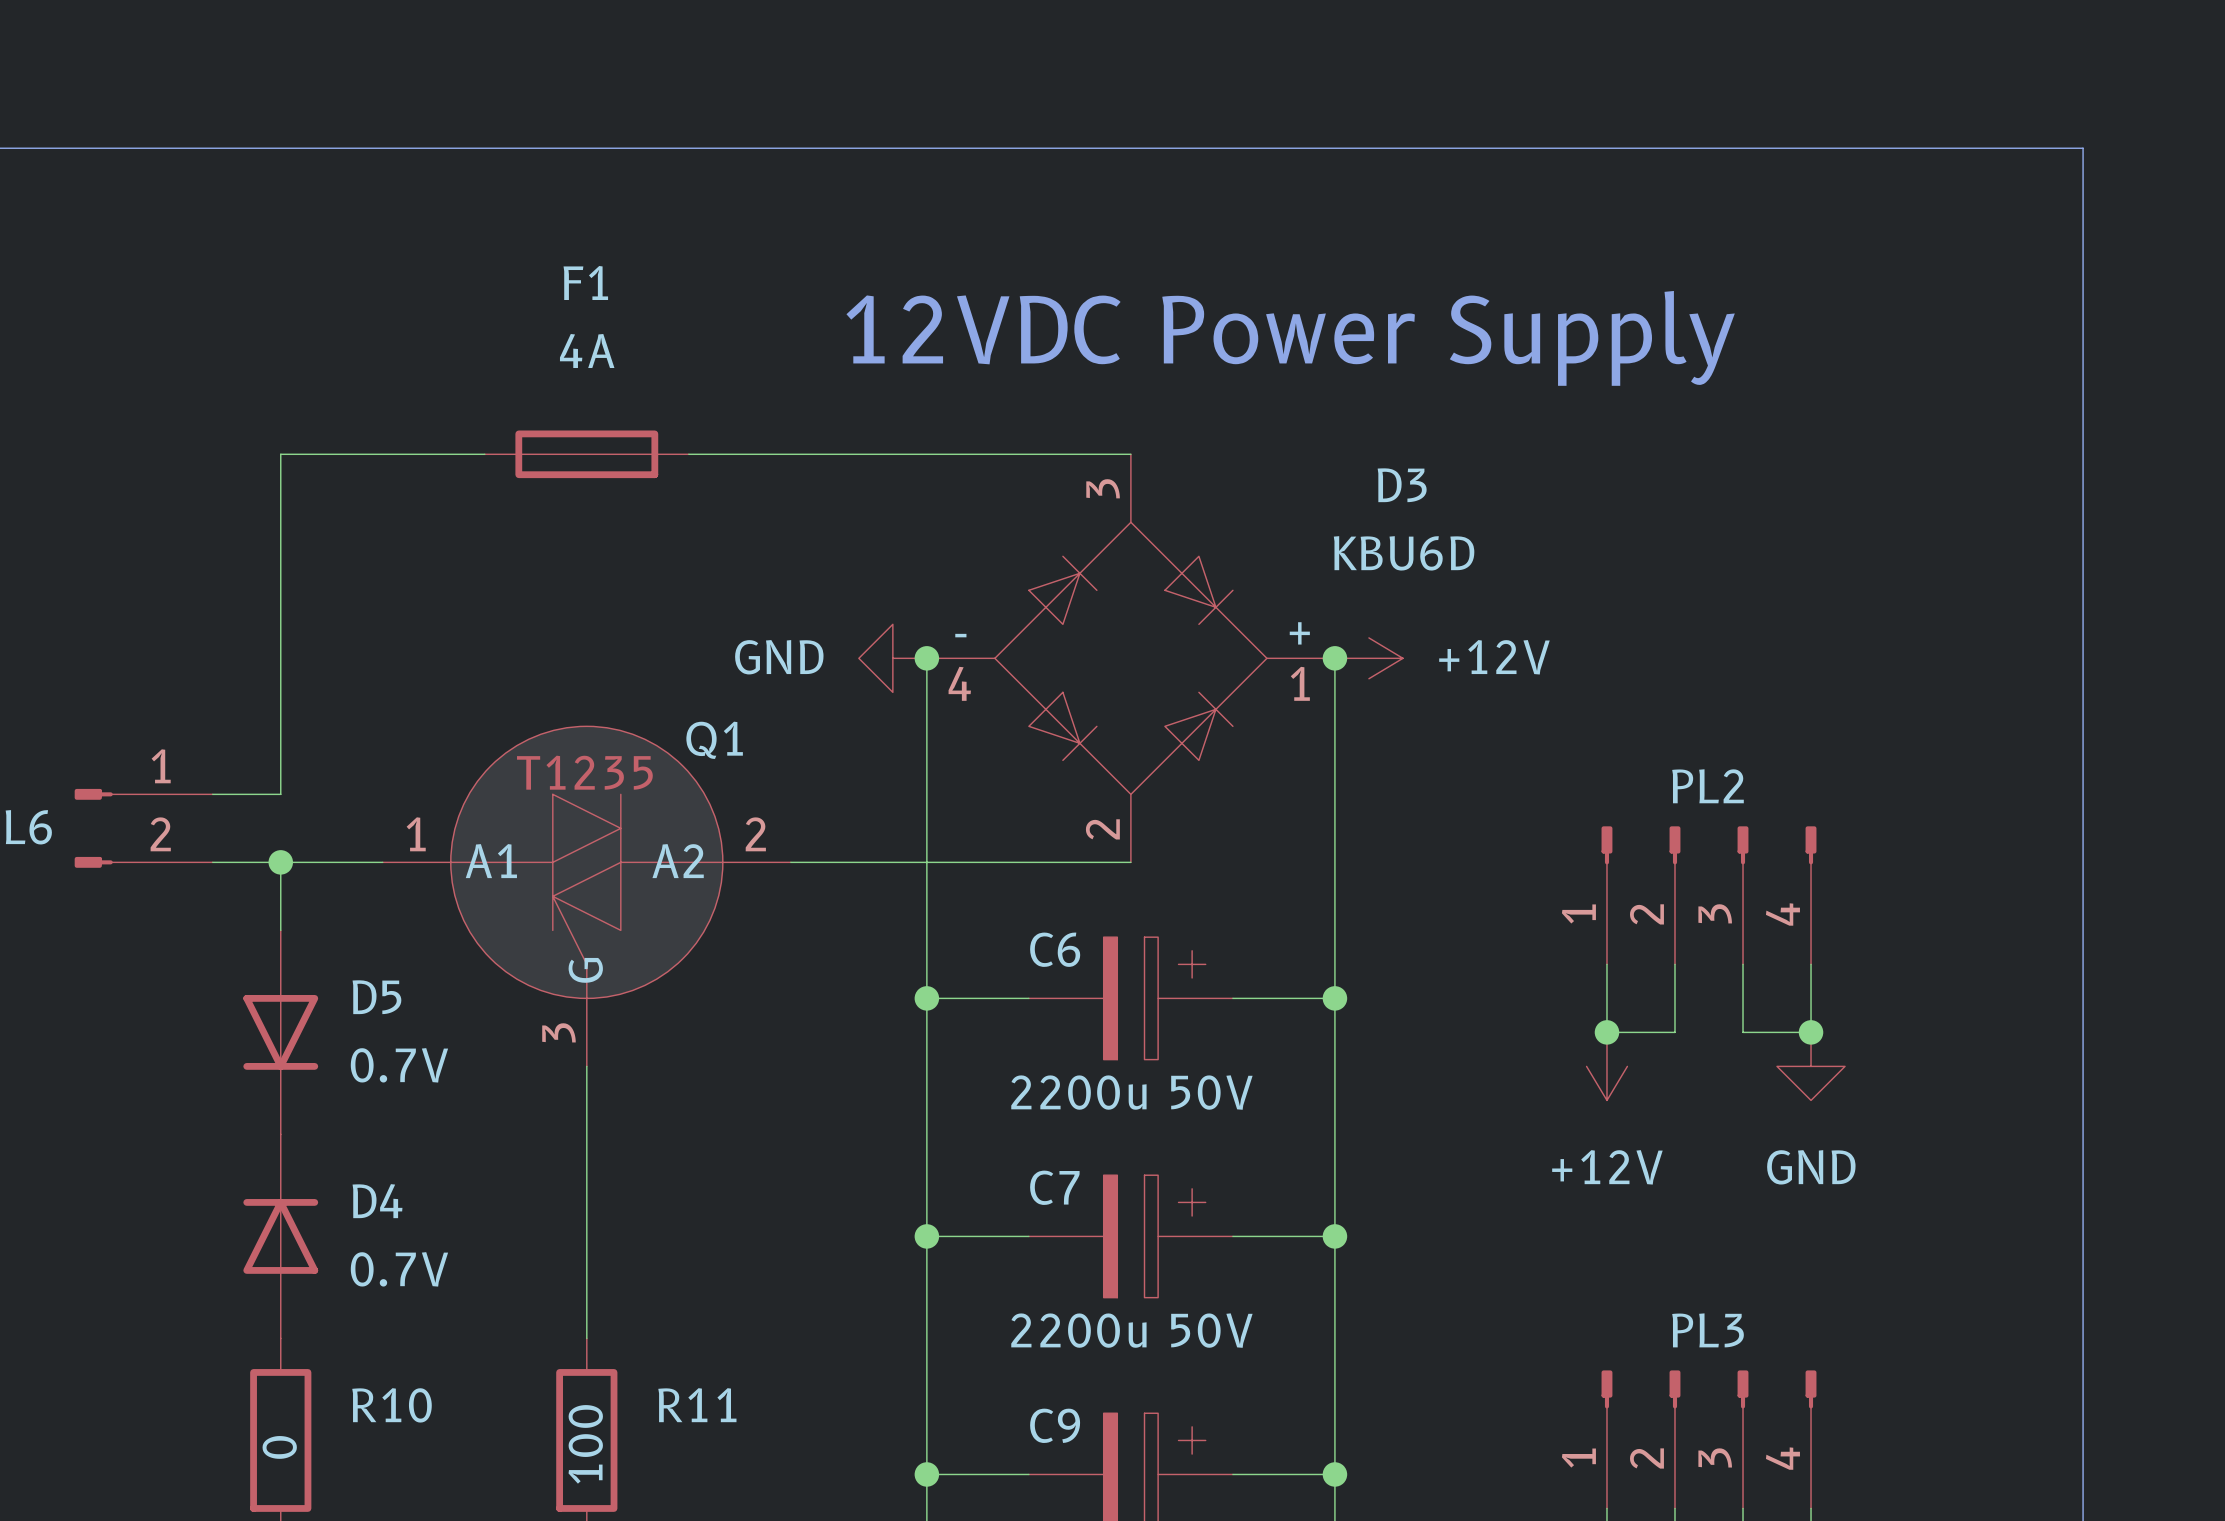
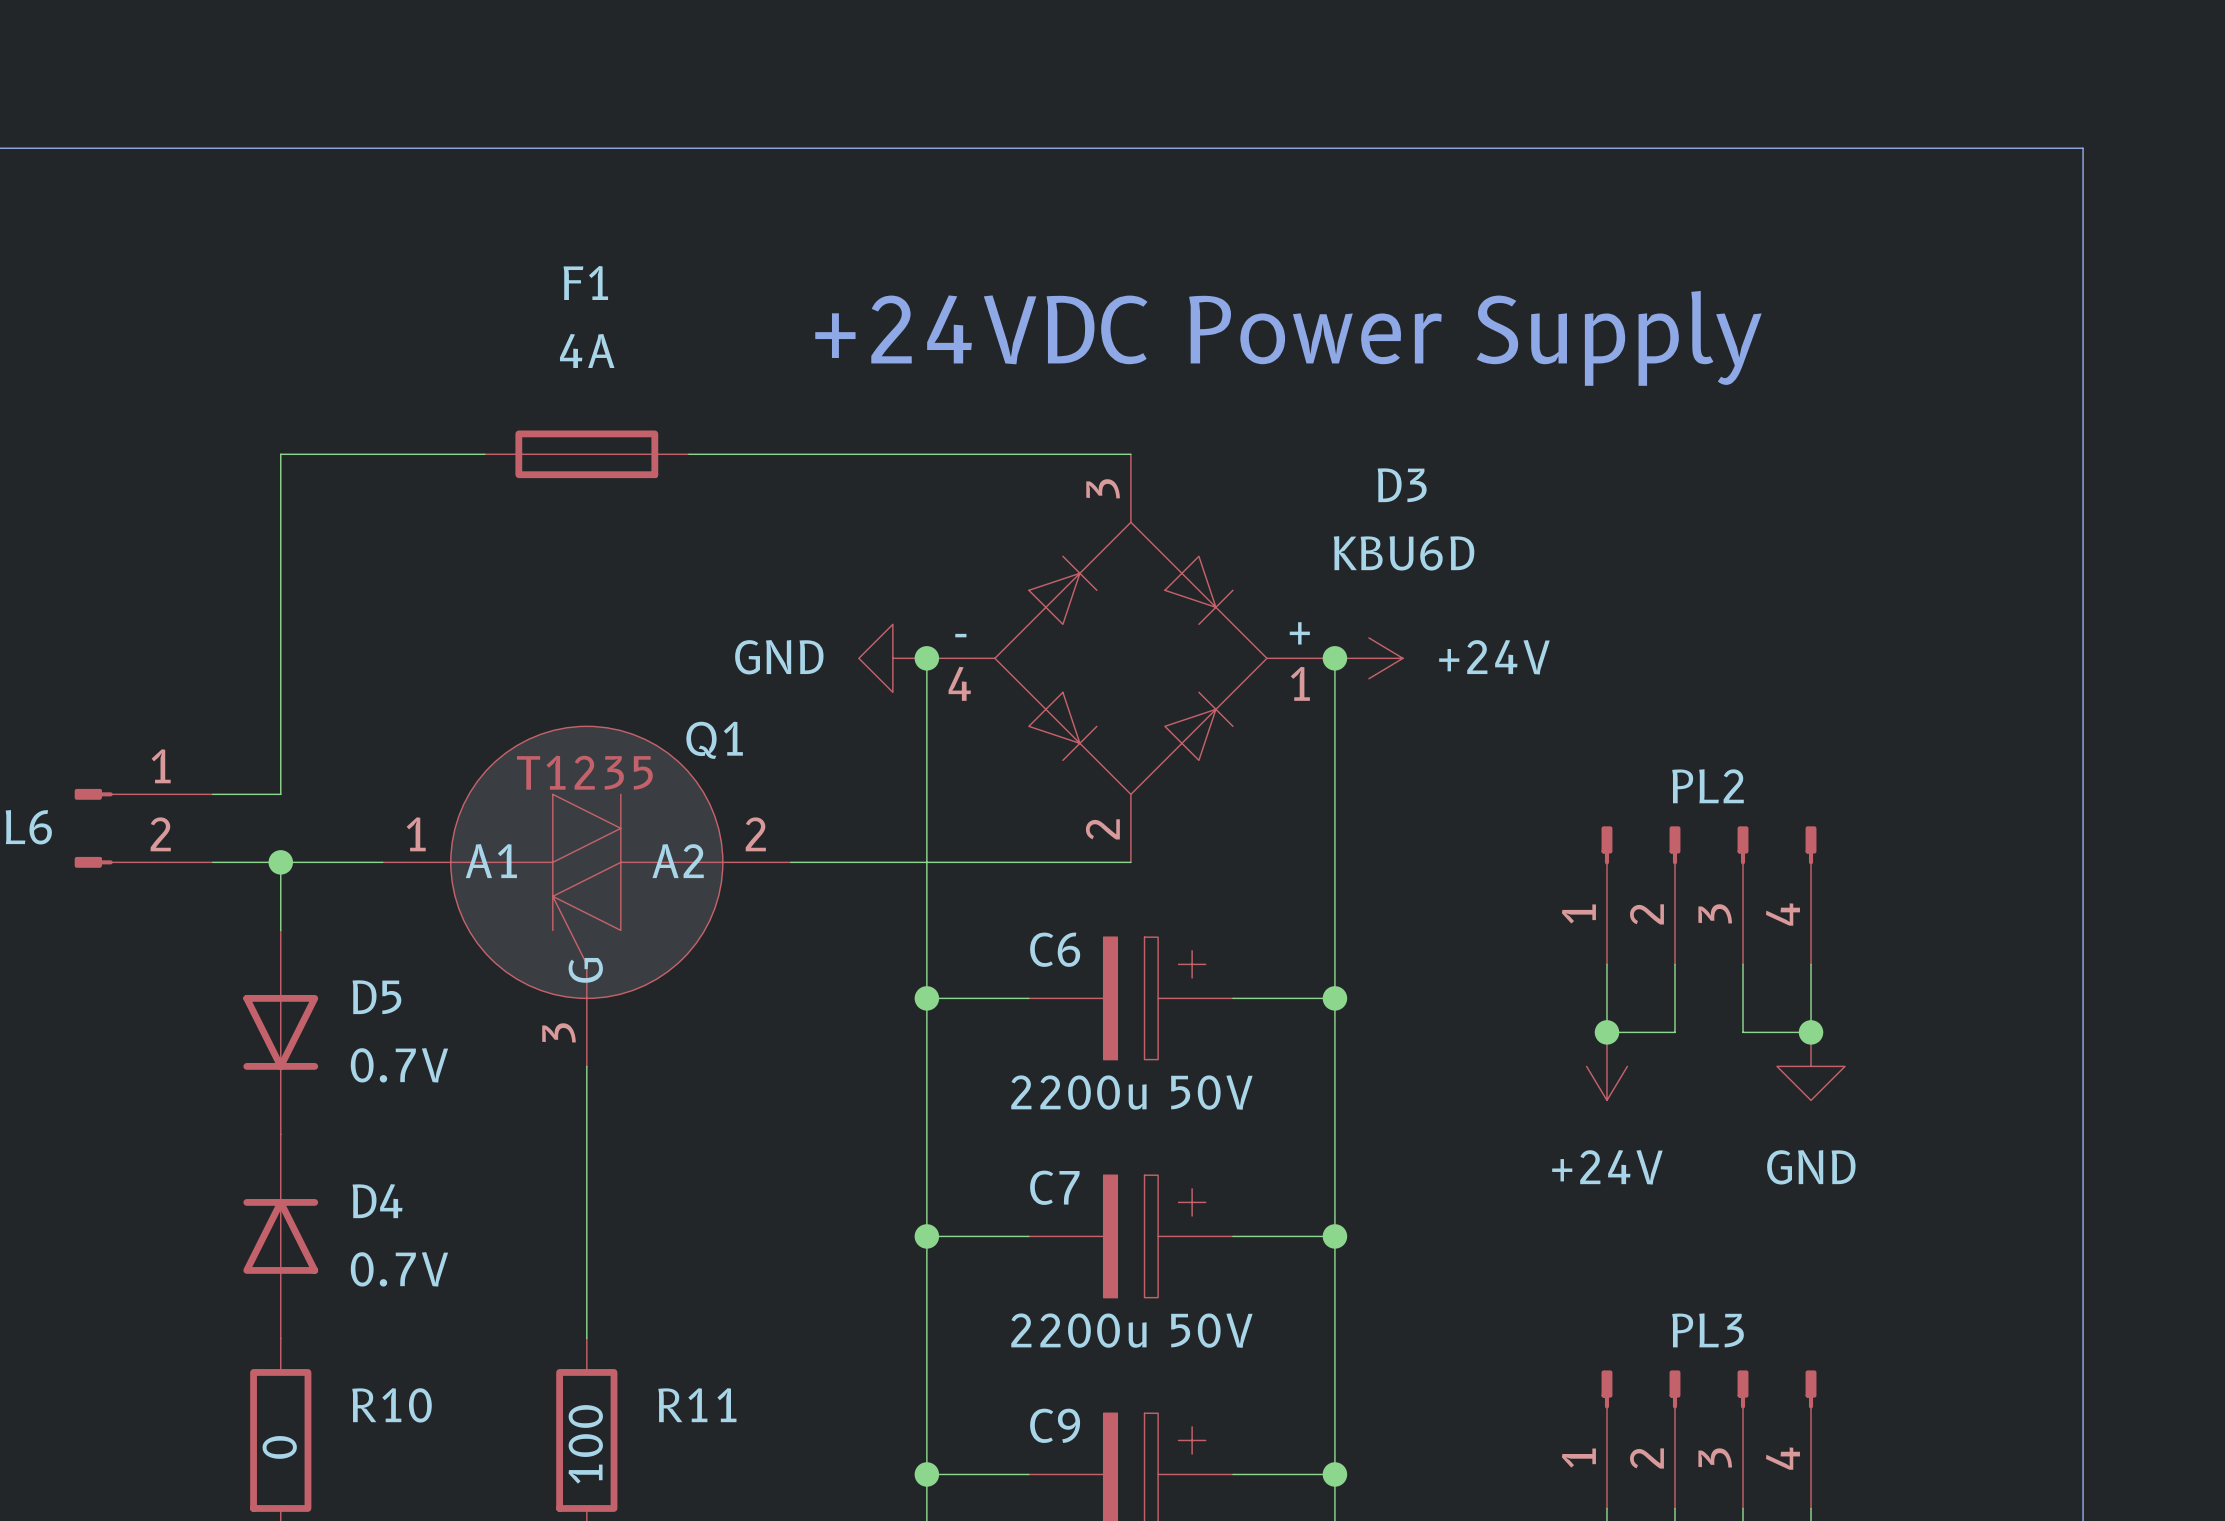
text: 12VDC Power Supply (1290, 338) -> +24VDC Power Supply (1288, 338)
power symbol: +12V (1368, 658) -> +24V (1368, 658)
power symbol: +12V (1606, 1066) -> +24V (1606, 1066)

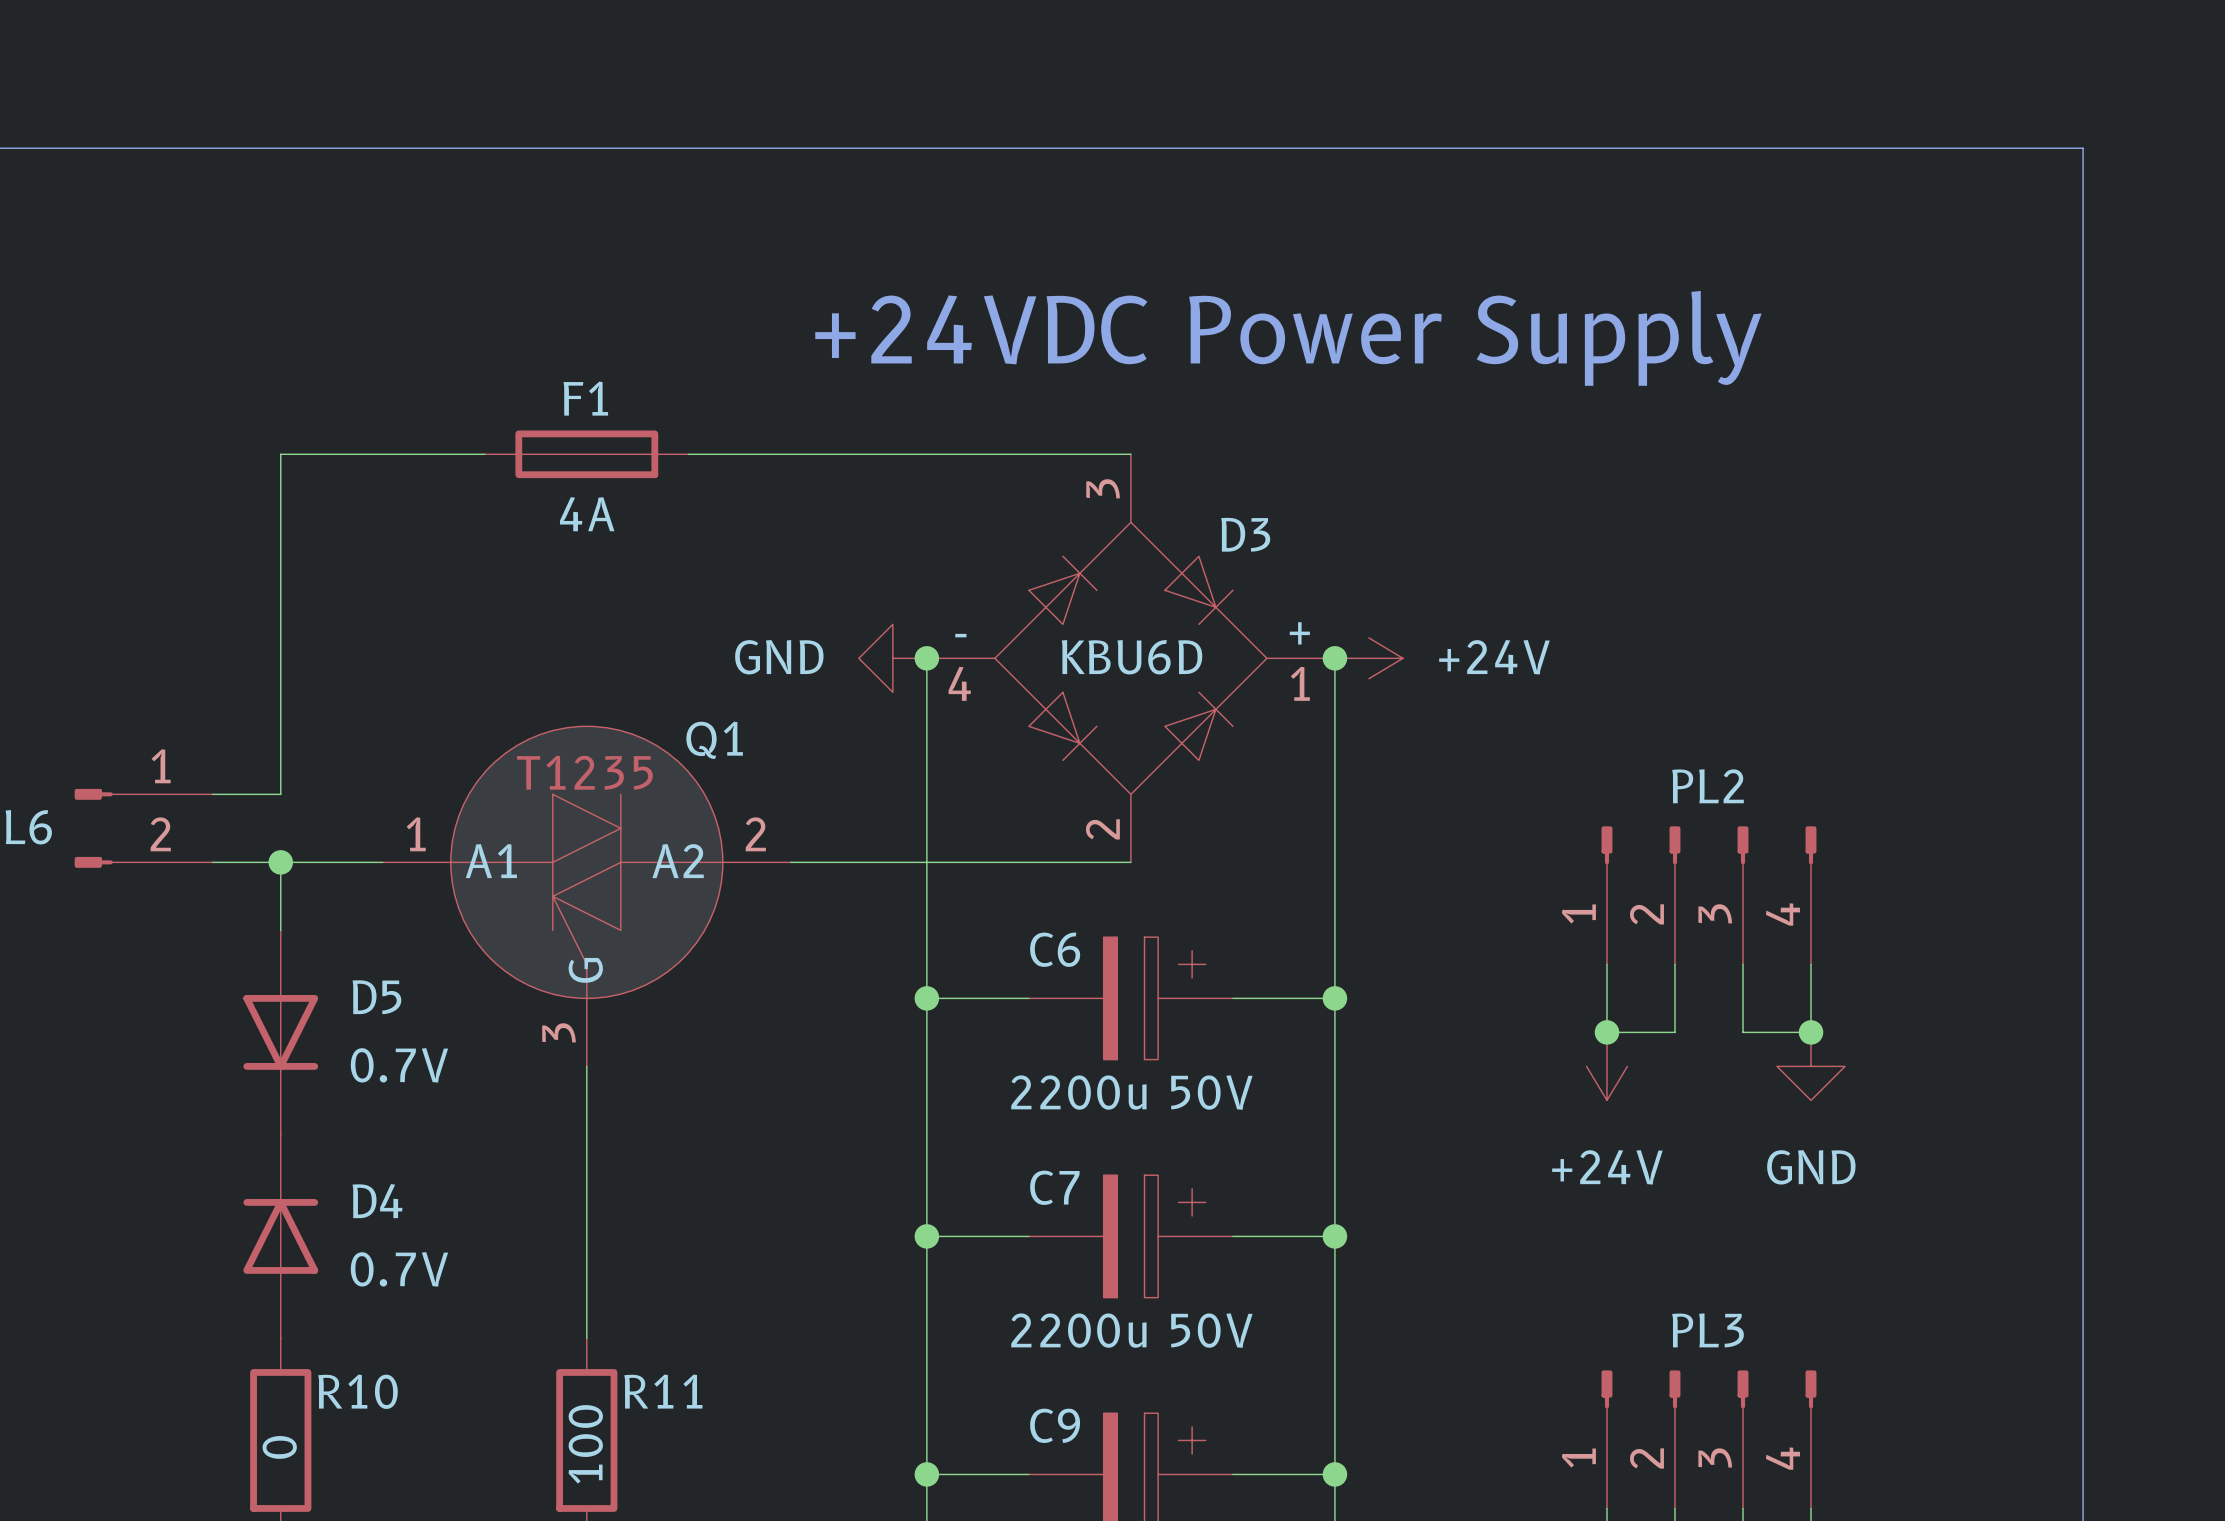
F1 name position: F1 (585, 283) -> F1 (585, 398)
F1 value position: 4A (587, 351) -> 4A (587, 514)
D3 name position: D3 (1402, 485) -> D3 (1245, 534)
D3 value position: KBU6D (1404, 553) -> KBU6D (1132, 657)
R10 name position: R10 (392, 1405) -> R10 (358, 1391)
R11 name position: R11 (697, 1405) -> R11 (663, 1391)

